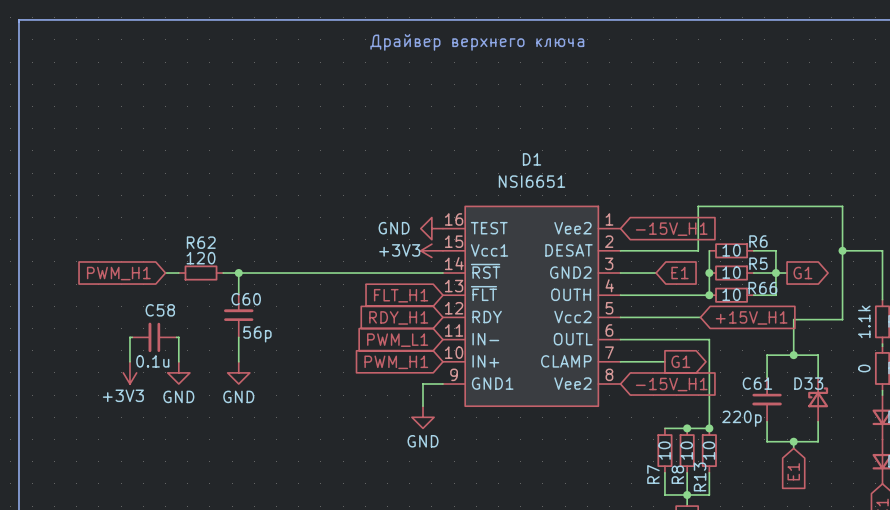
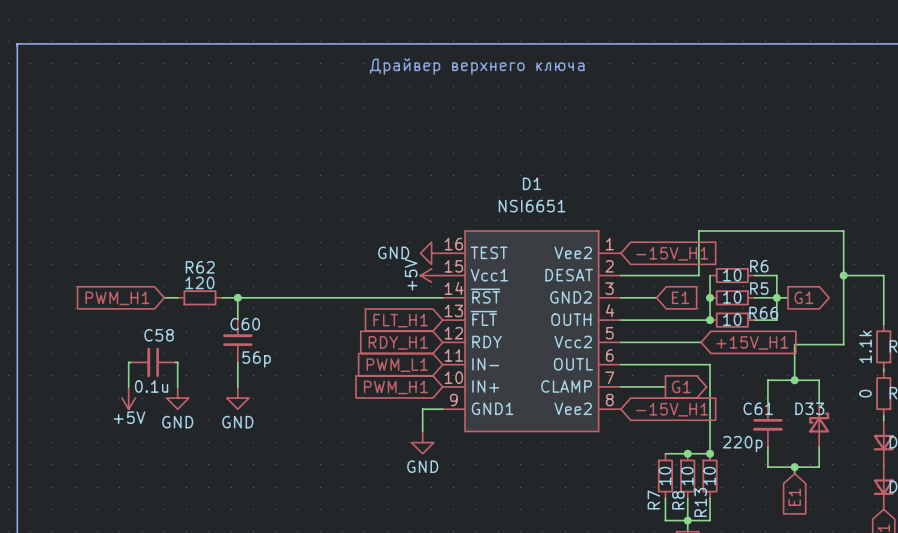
power symbol: +3V3 (431, 250) -> +5V (431, 275)
power symbol: +3V3 (129, 372) -> +5V (128, 398)

